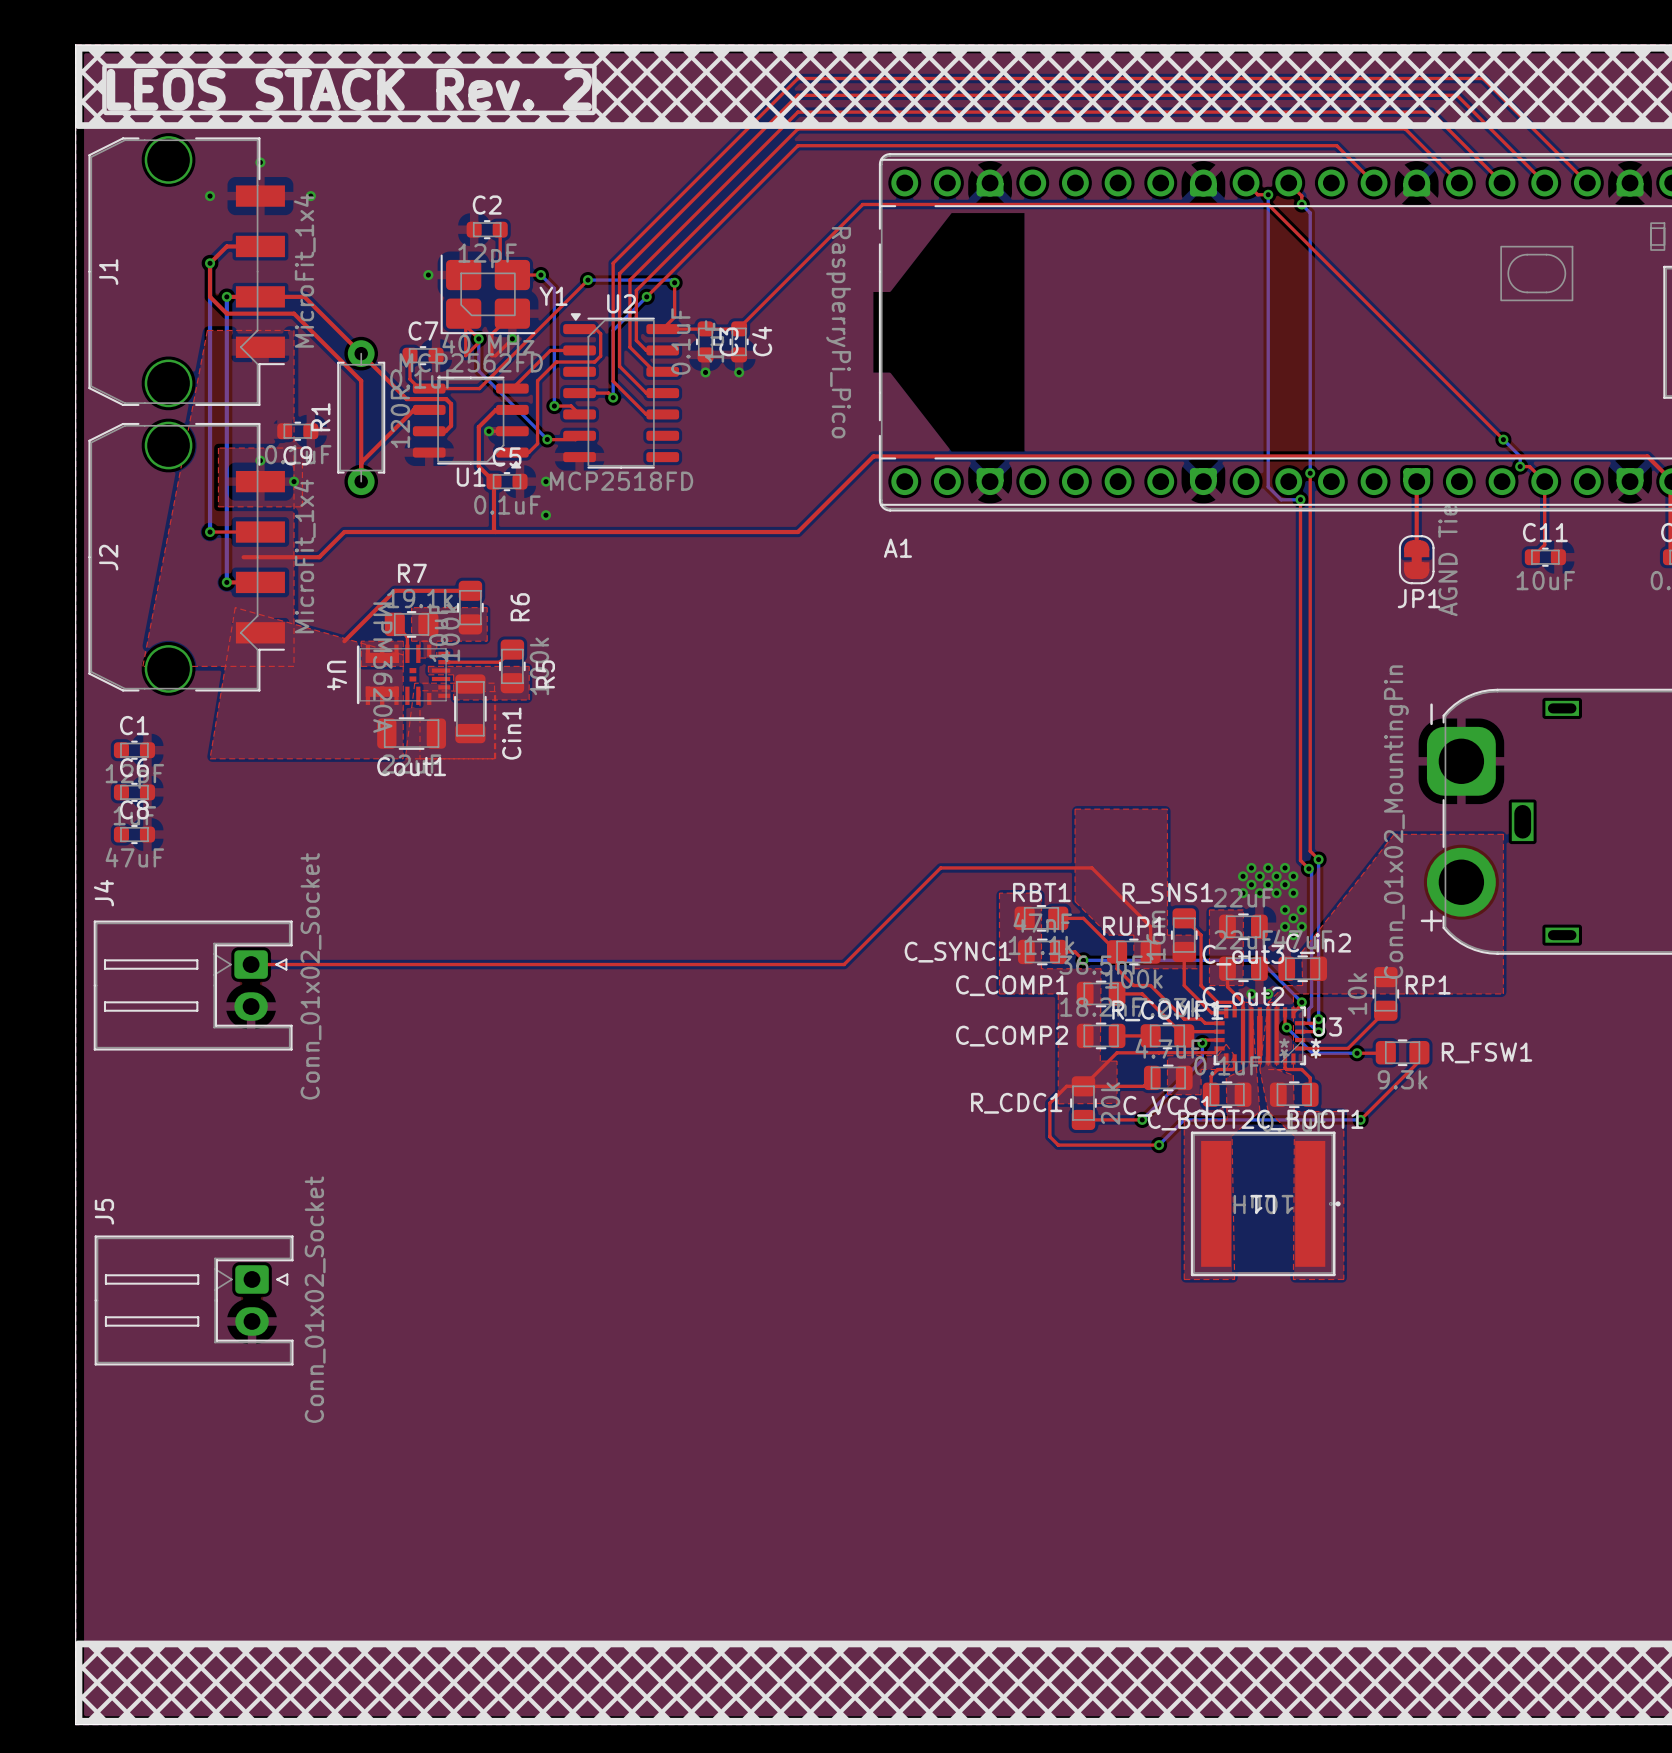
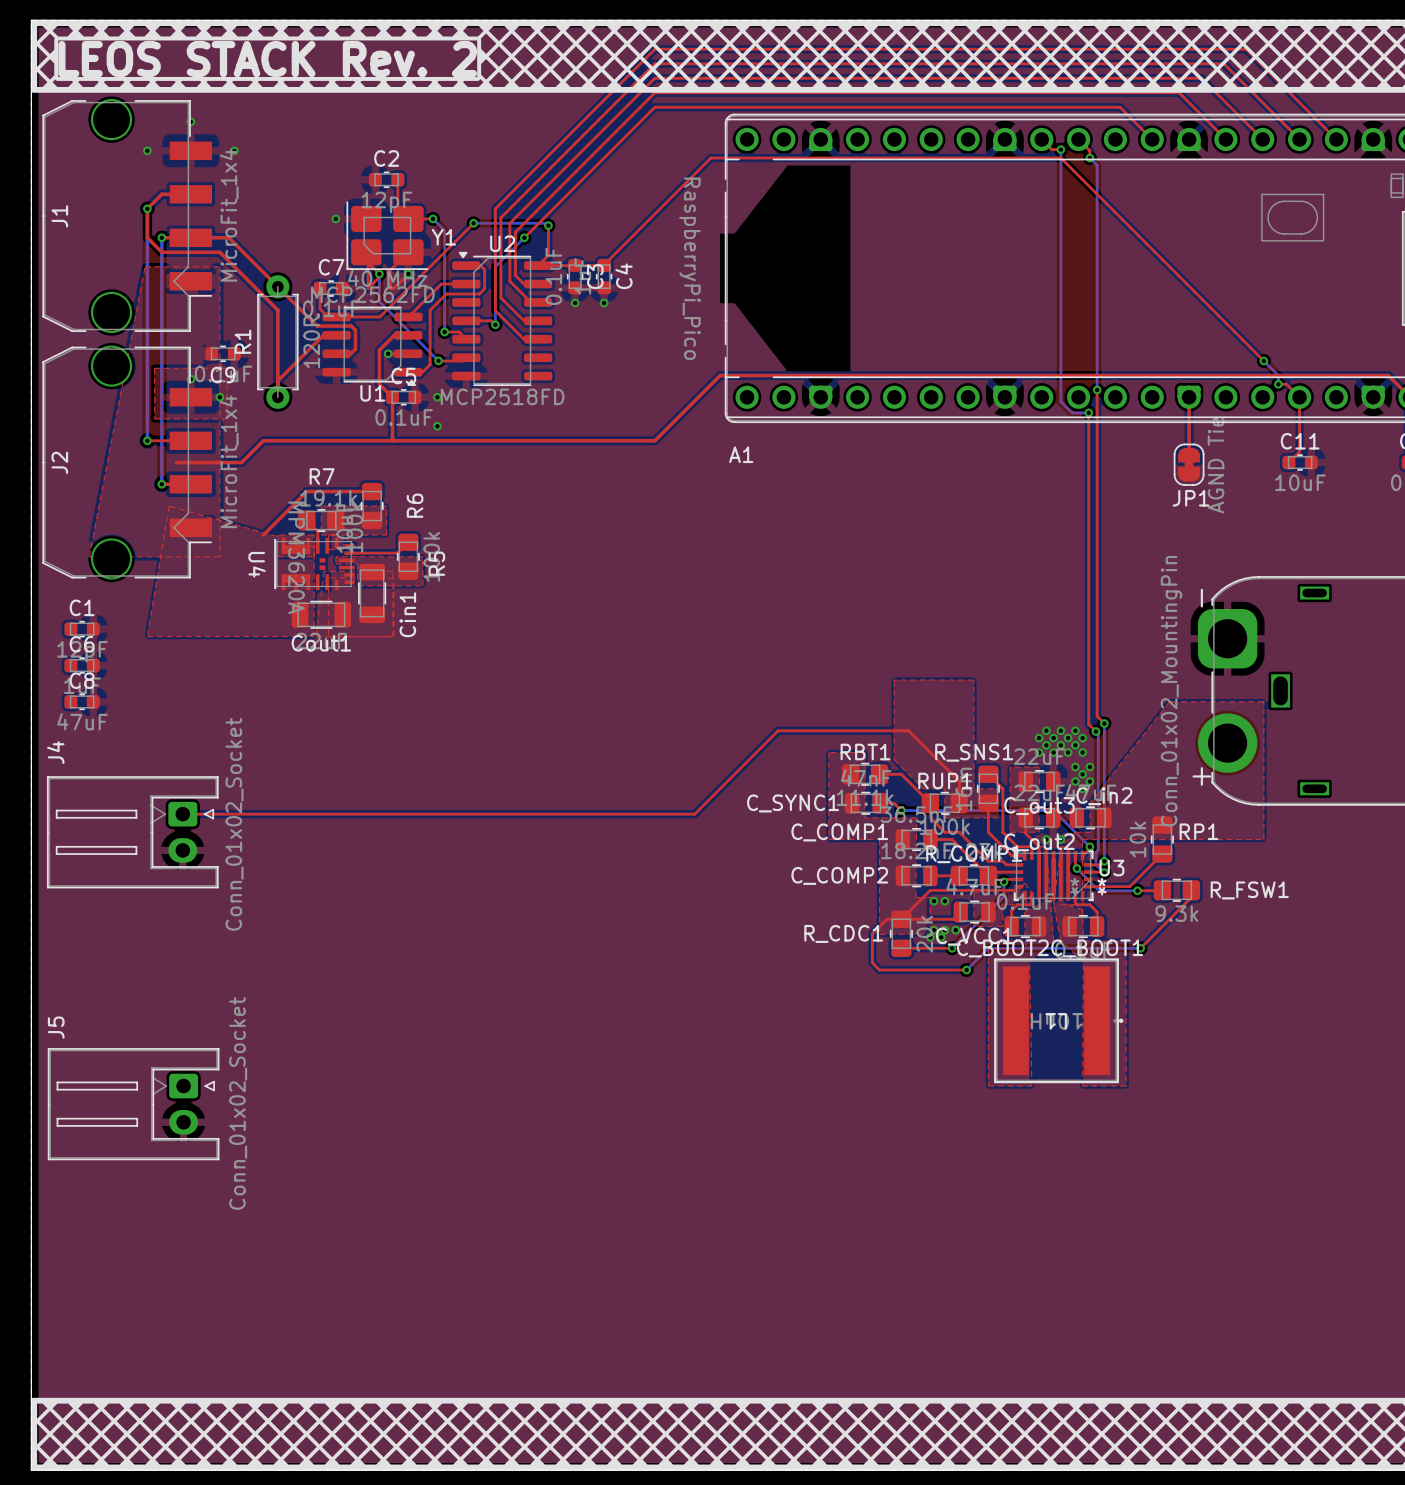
via: none -> (934, 901)
via: none -> (944, 901)
via: none -> (934, 930)
via: none -> (944, 930)
via: none -> (955, 930)
via: none -> (930, 937)
via: none -> (941, 937)

